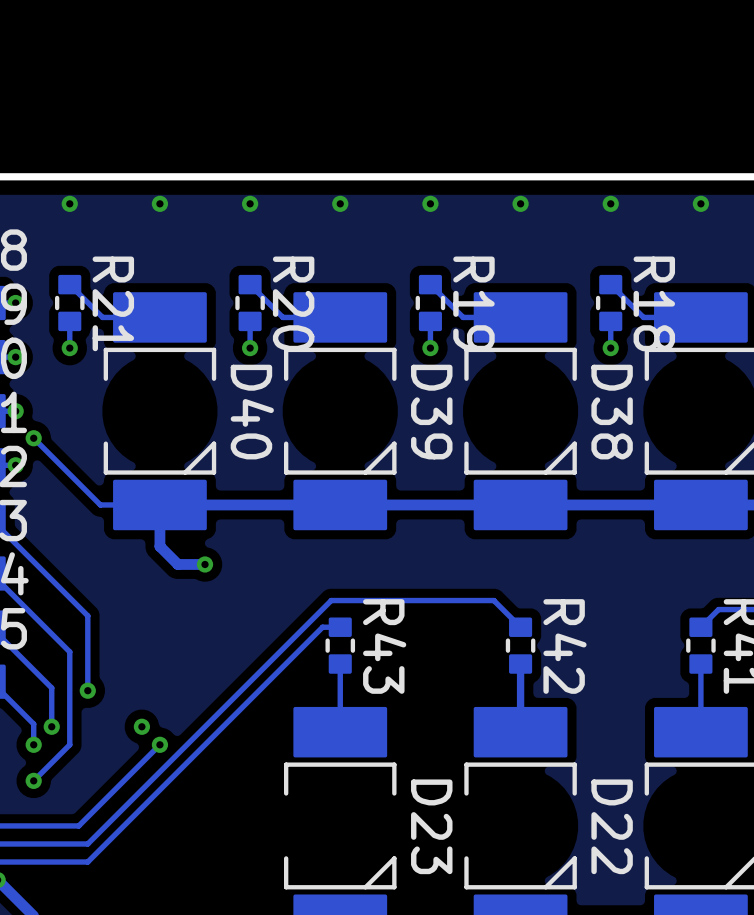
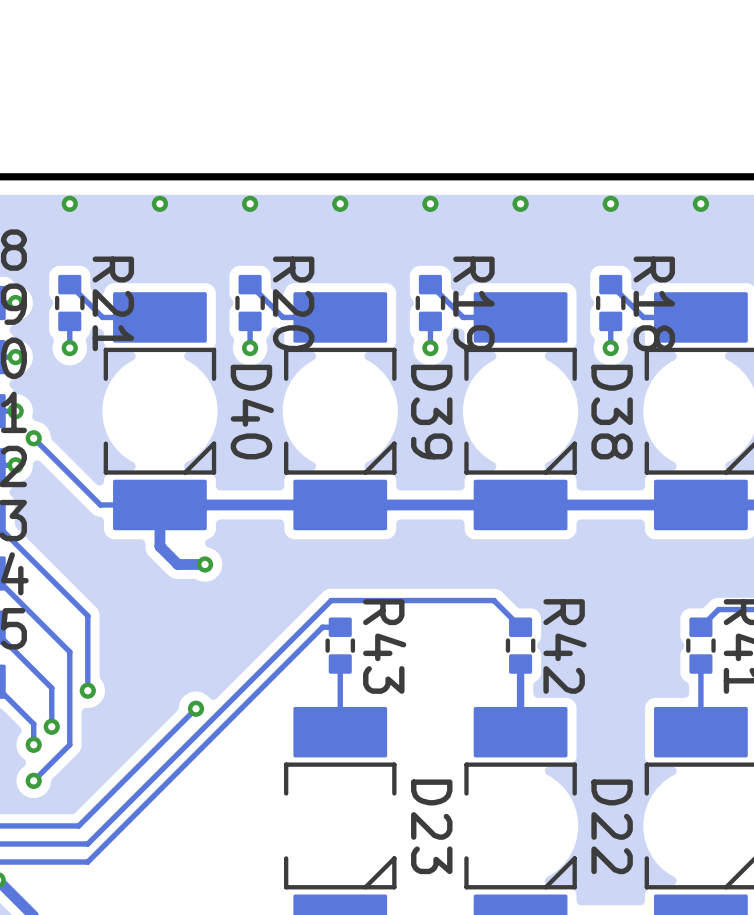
track: none -> (196, 708) (159, 744)
via: none -> (196, 708)
via: (141, 726) -> none
via: (159, 744) -> none

